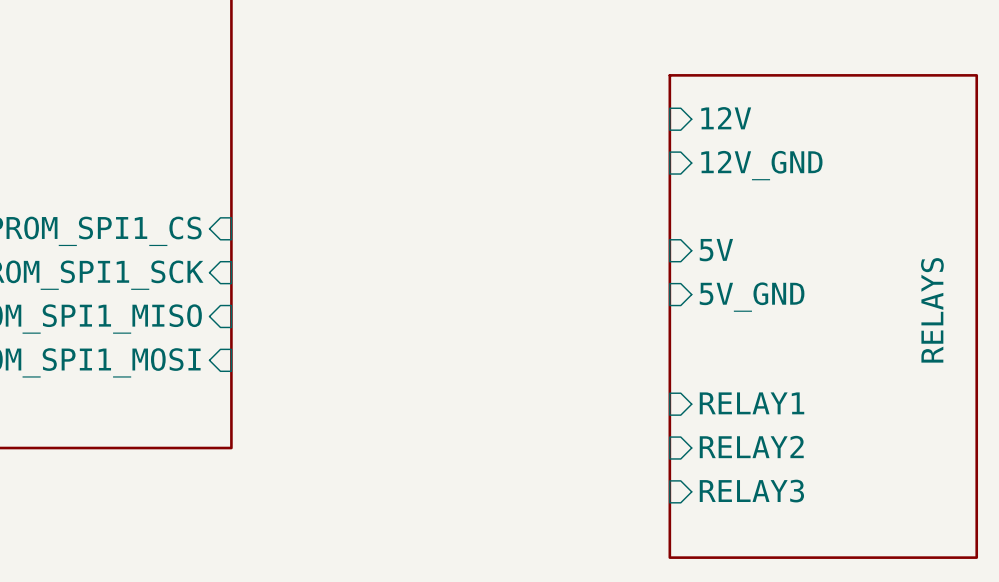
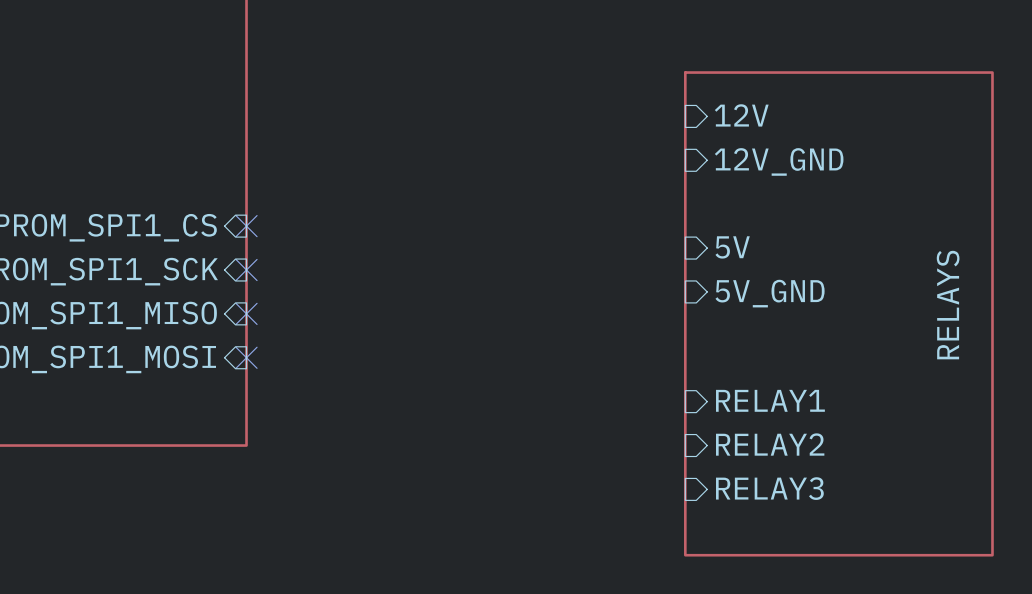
no-connect mark: none -> (246, 226)
no-connect mark: none -> (246, 270)
no-connect mark: none -> (246, 313)
no-connect mark: none -> (246, 357)

